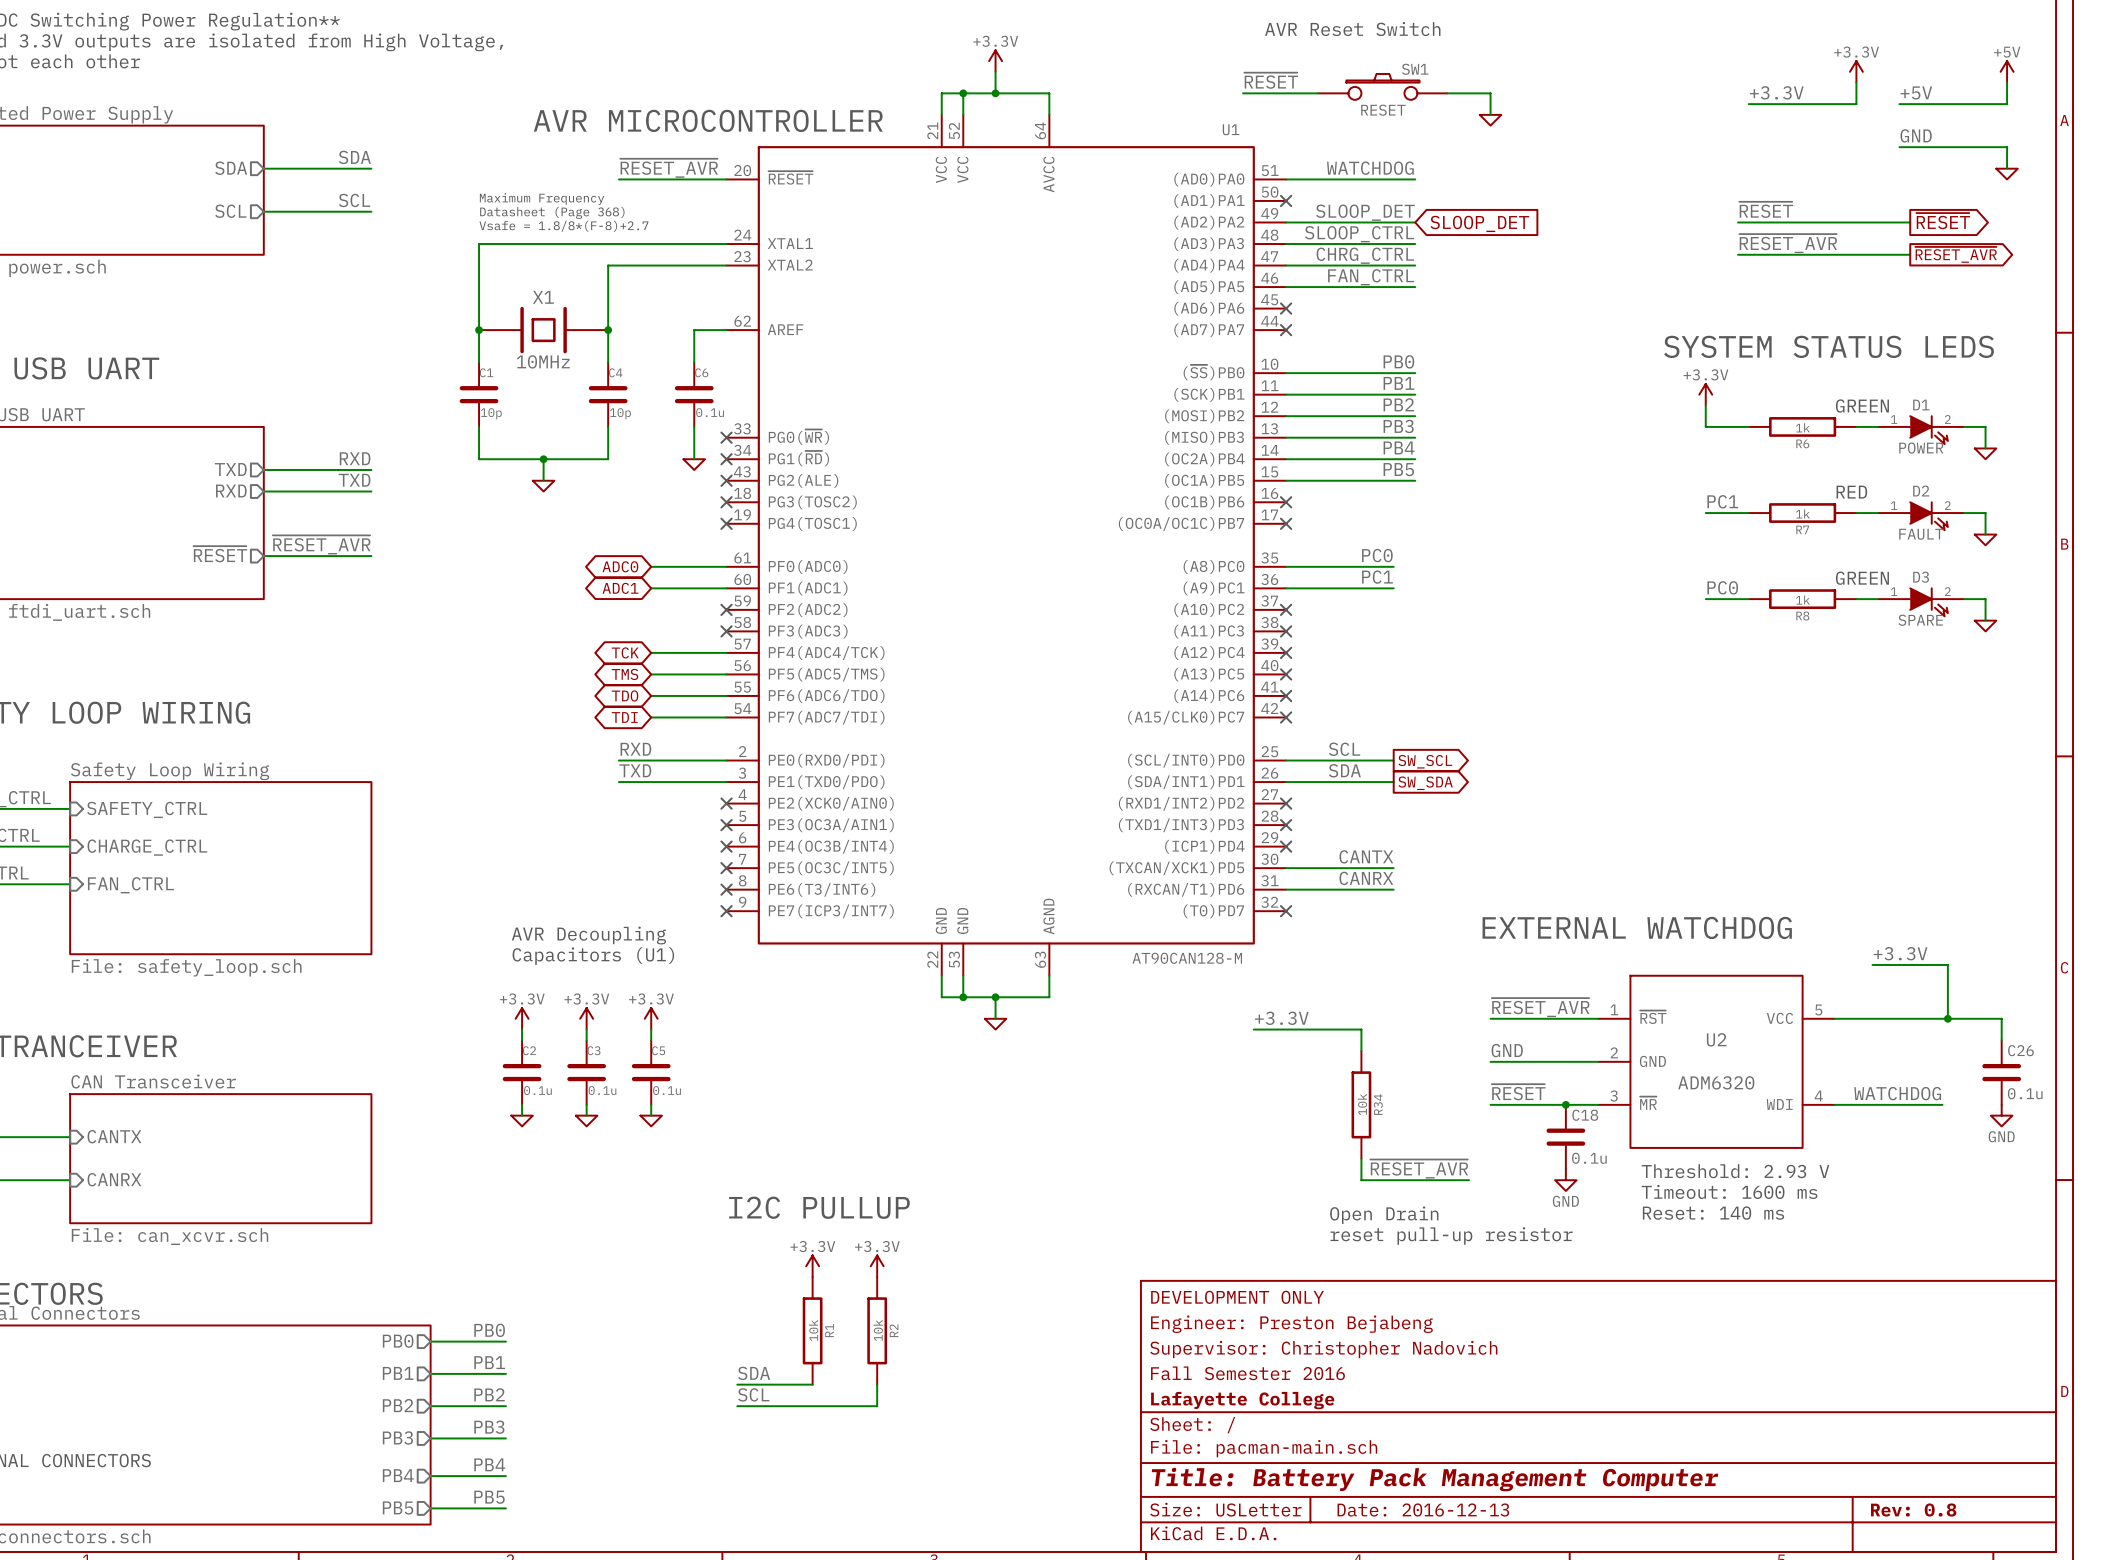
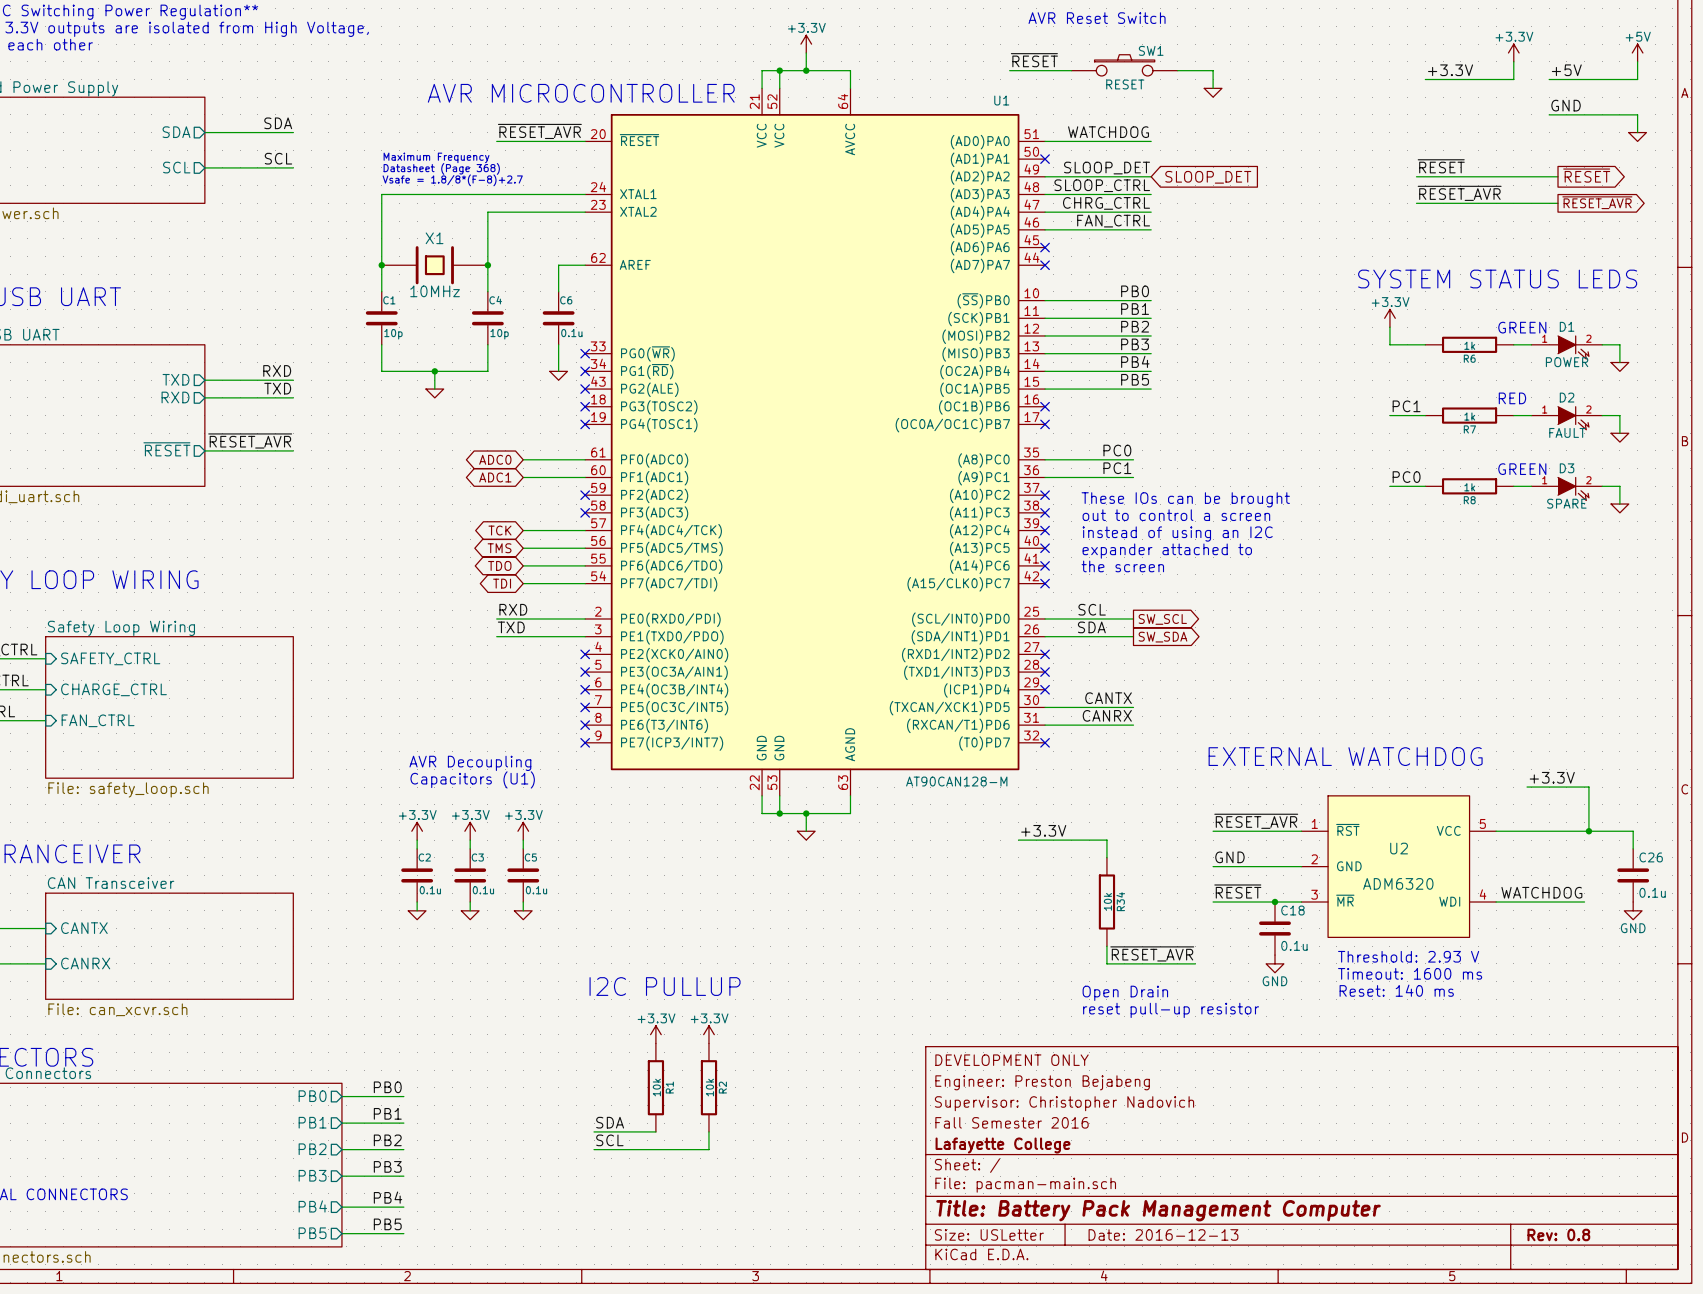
text: none -> These IOs can be brought (1185, 499)
text: none -> out to control a screen (1176, 515)
text: none -> instead of using an I2C (1177, 534)
text: none -> expander attached to (1167, 551)
text: none -> the screen (1122, 566)

